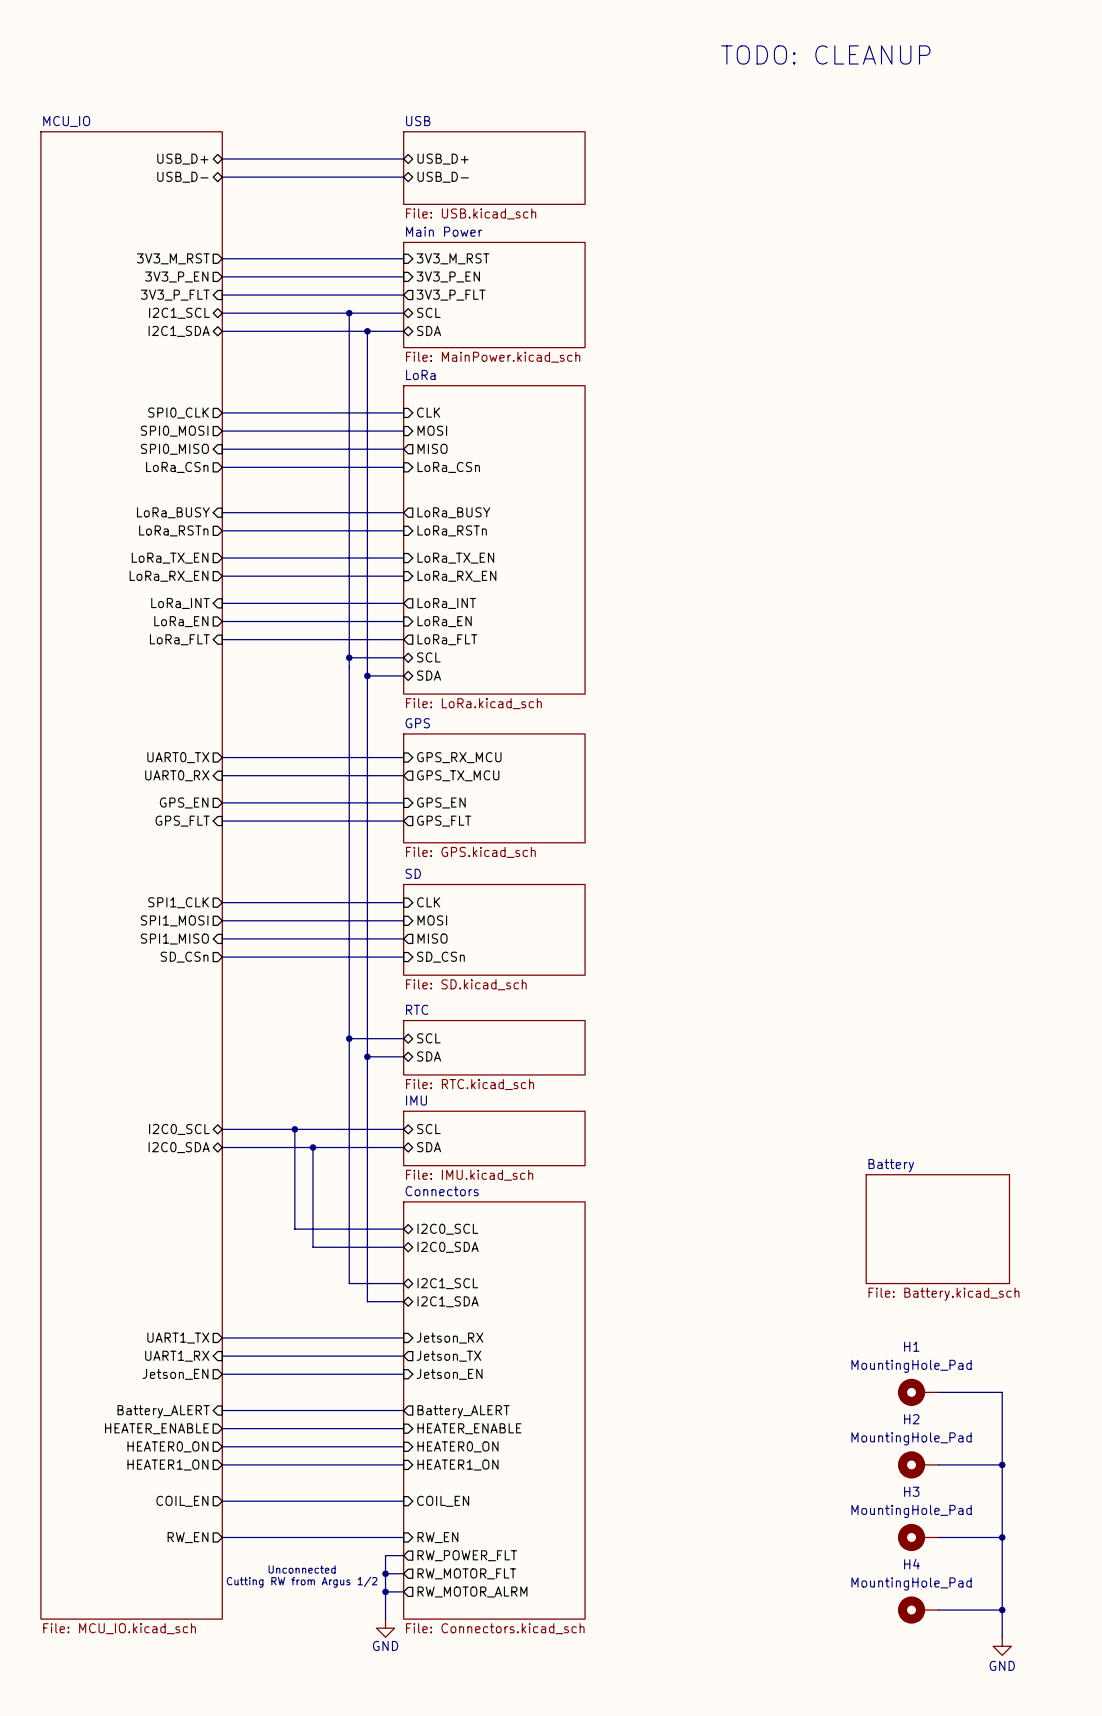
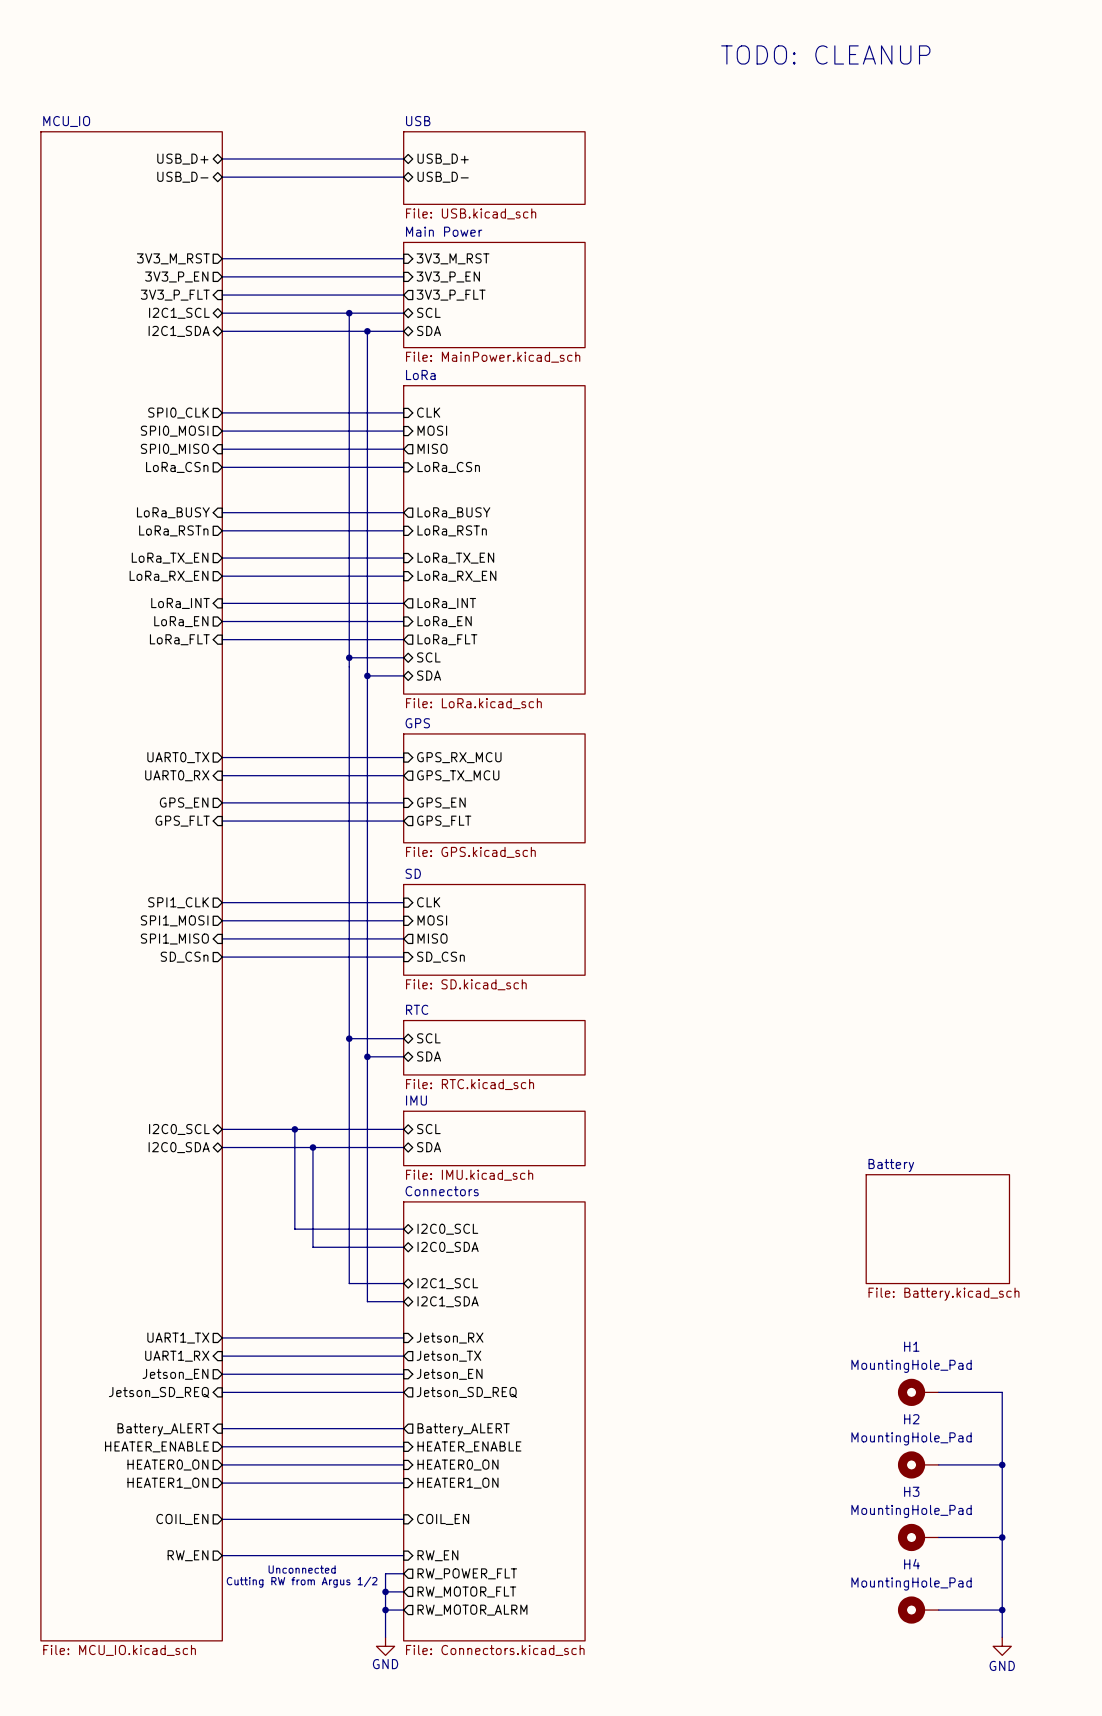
sheet MCU_IO: File: MCU_IO.kicad_sch (131, 875) -> none
sheet MCU_IO: none -> File: MCU_IO.kicad_sch (131, 886)
sheet pin: none -> Jetson_SD_REQ (159, 1392)
sheet pin: none -> Jetson_SD_REQ (466, 1392)
wire: (222, 1410) (403, 1410) -> (222, 1392) (403, 1392)
sheet Connectors: File: Connectors.kicad_sch (494, 1410) -> none
sheet pin: Battery_ALERT (163, 1411) -> none
sheet pin: Battery_ALERT (463, 1411) -> none
sheet Connectors: none -> File: Connectors.kicad_sch (494, 1421)
sheet pin shape: output (156, 1428) -> input (163, 1429)
sheet pin: HEATER_ENABLE (156, 1428) -> Battery_ALERT (163, 1429)
sheet pin shape: input (469, 1428) -> output (463, 1429)
sheet pin: HEATER_ENABLE (469, 1428) -> Battery_ALERT (463, 1429)
sheet pin: HEATER0_ON (167, 1446) -> HEATER_ENABLE (156, 1446)
sheet pin: HEATER0_ON (458, 1446) -> HEATER_ENABLE (469, 1446)
sheet pin: HEATER1_ON (167, 1465) -> HEATER0_ON (167, 1465)
sheet pin: HEATER1_ON (458, 1465) -> HEATER0_ON (458, 1465)
sheet pin: none -> HEATER1_ON (167, 1483)
sheet pin: none -> HEATER1_ON (458, 1483)
sheet pin position: COIL_EN (182, 1501) -> COIL_EN (182, 1519)
wire: (222, 1501) (403, 1501) -> (222, 1483) (403, 1483)
sheet pin position: COIL_EN (443, 1501) -> COIL_EN (443, 1519)
sheet pin position: RW_EN (188, 1537) -> RW_EN (188, 1555)
wire: (222, 1537) (403, 1537) -> (222, 1519) (403, 1519)
sheet pin: RW_EN (437, 1537) -> none
wire: (385, 1555) (385, 1573) -> (385, 1555) (222, 1555)
sheet pin shape: output (467, 1555) -> input (437, 1555)
sheet pin: RW_POWER_FLT (467, 1555) -> RW_EN (437, 1555)
junction position: (385, 1573) -> (385, 1610)
sheet pin: RW_MOTOR_FLT (466, 1573) -> RW_POWER_FLT (467, 1573)
sheet pin: RW_MOTOR_ALRM (472, 1591) -> RW_MOTOR_FLT (466, 1591)
wire: none -> (385, 1610) (403, 1610)
sheet pin: none -> RW_MOTOR_ALRM (472, 1610)
power symbol position: GND (385, 1628) -> GND (385, 1646)

